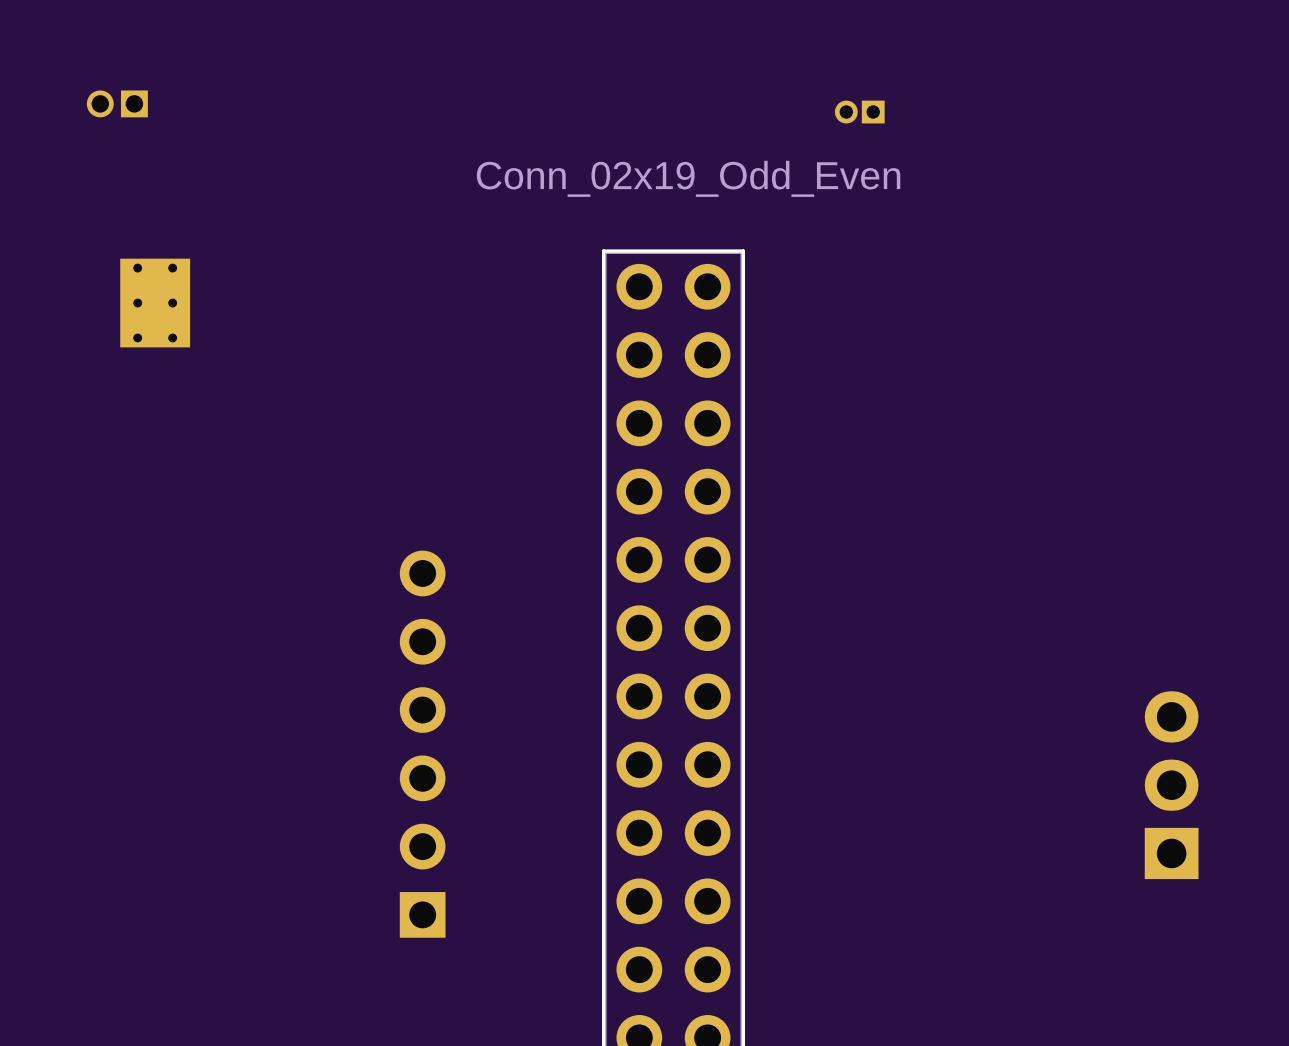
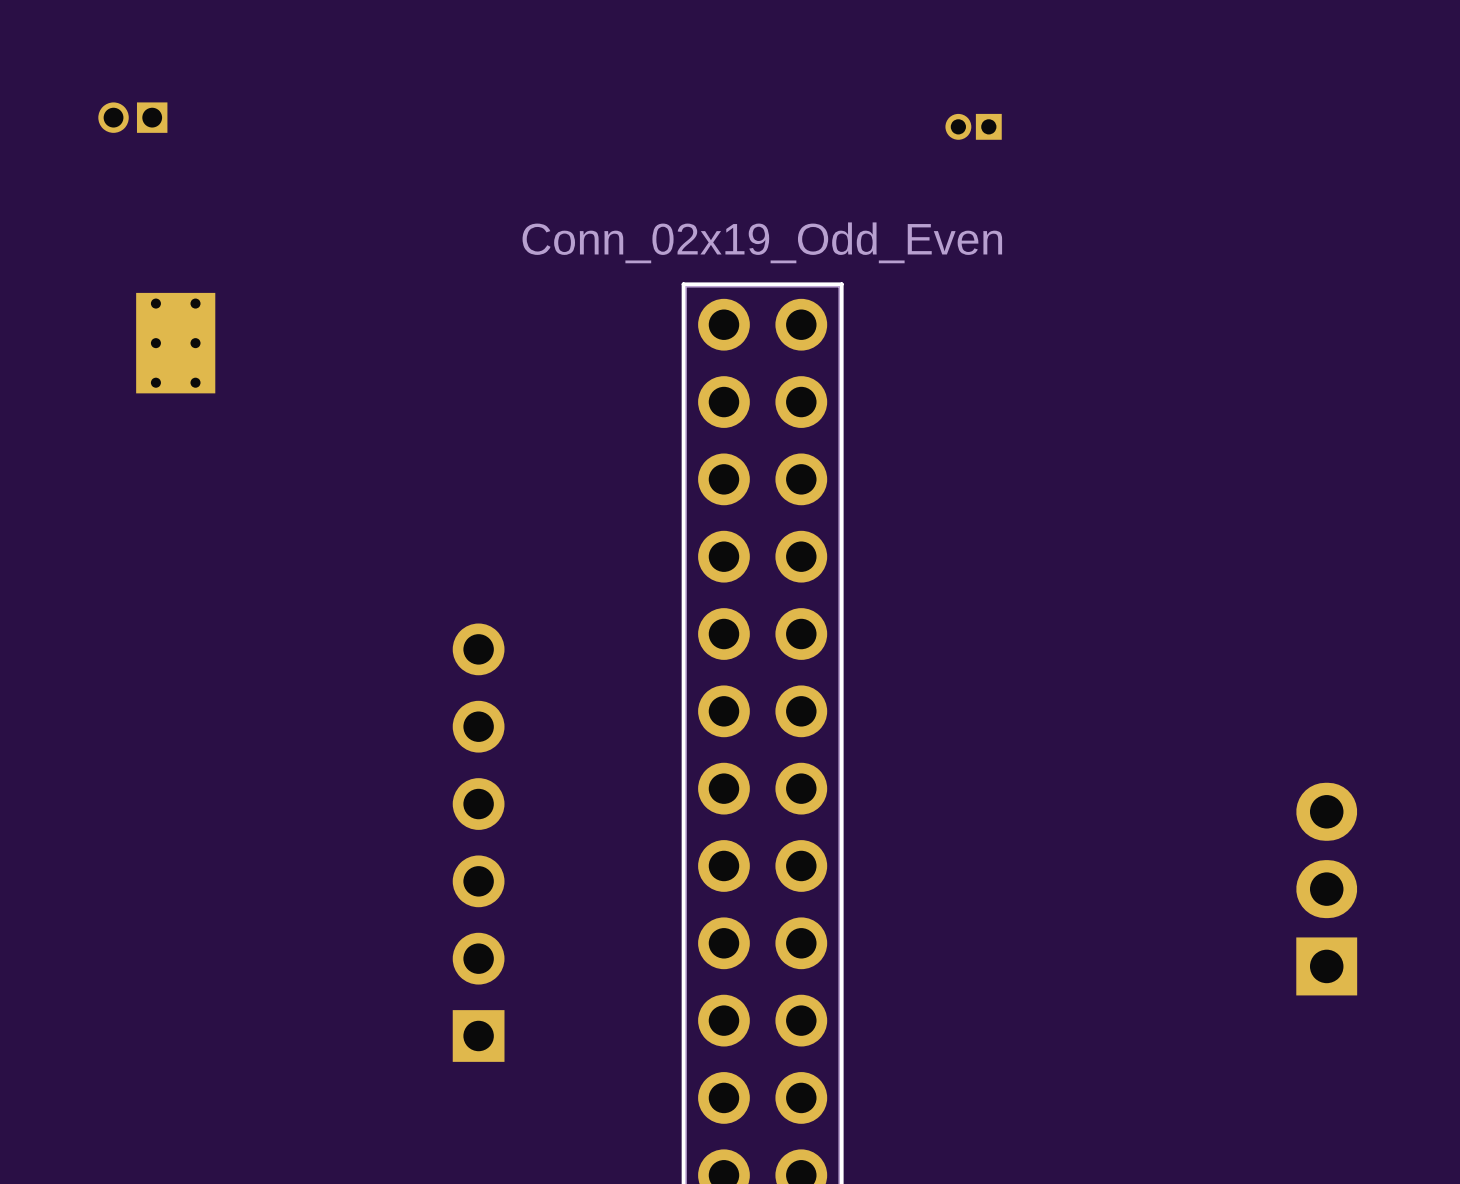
part value position: Conn_02x19_Odd_Even (688, 178) -> Conn_02x19_Odd_Even (762, 242)

